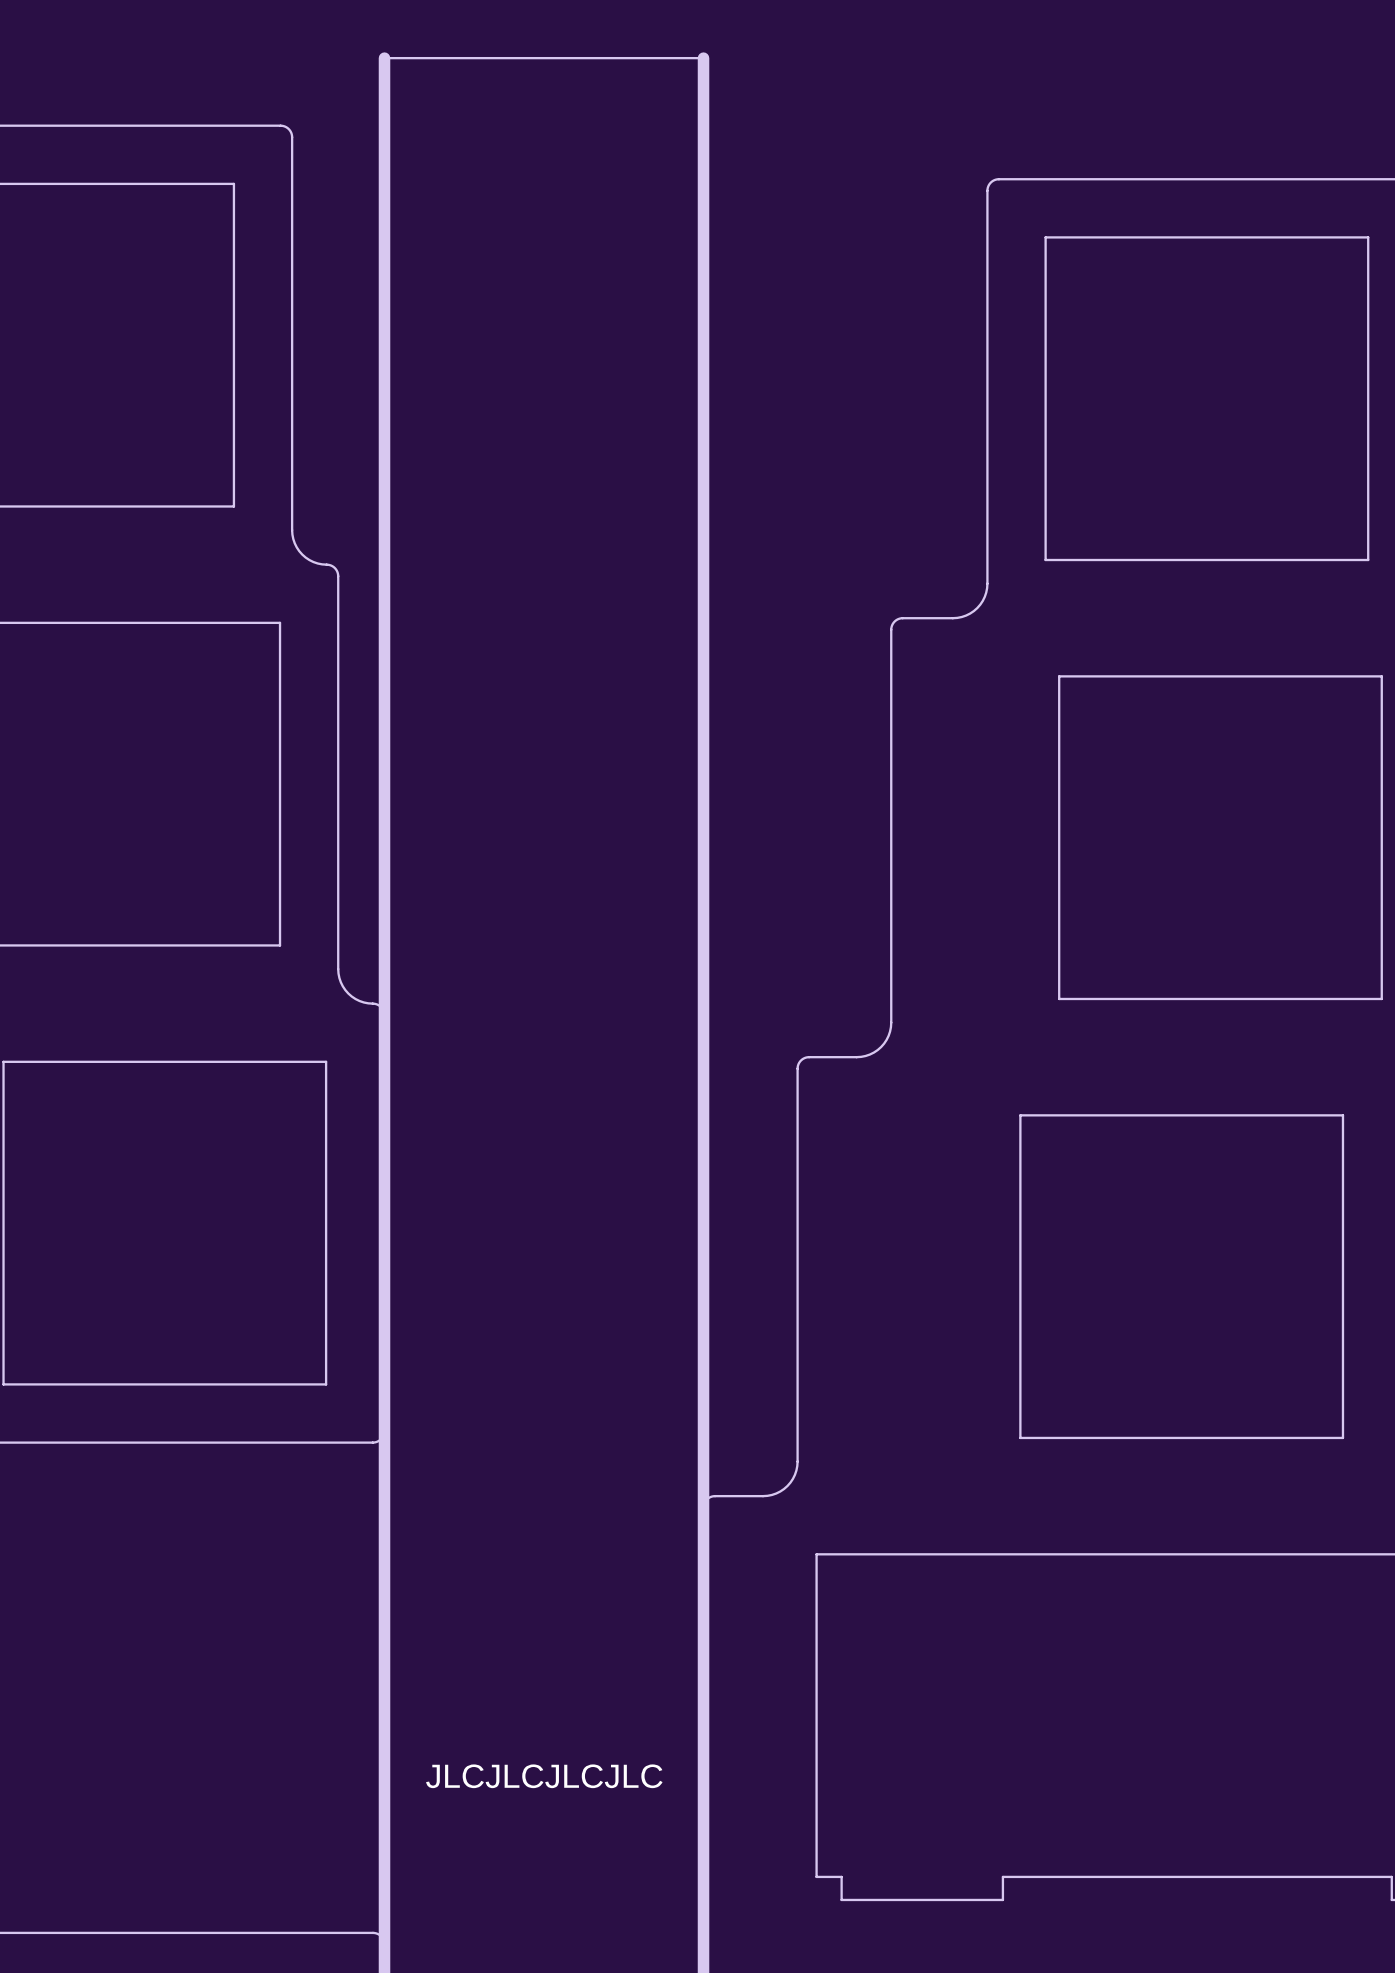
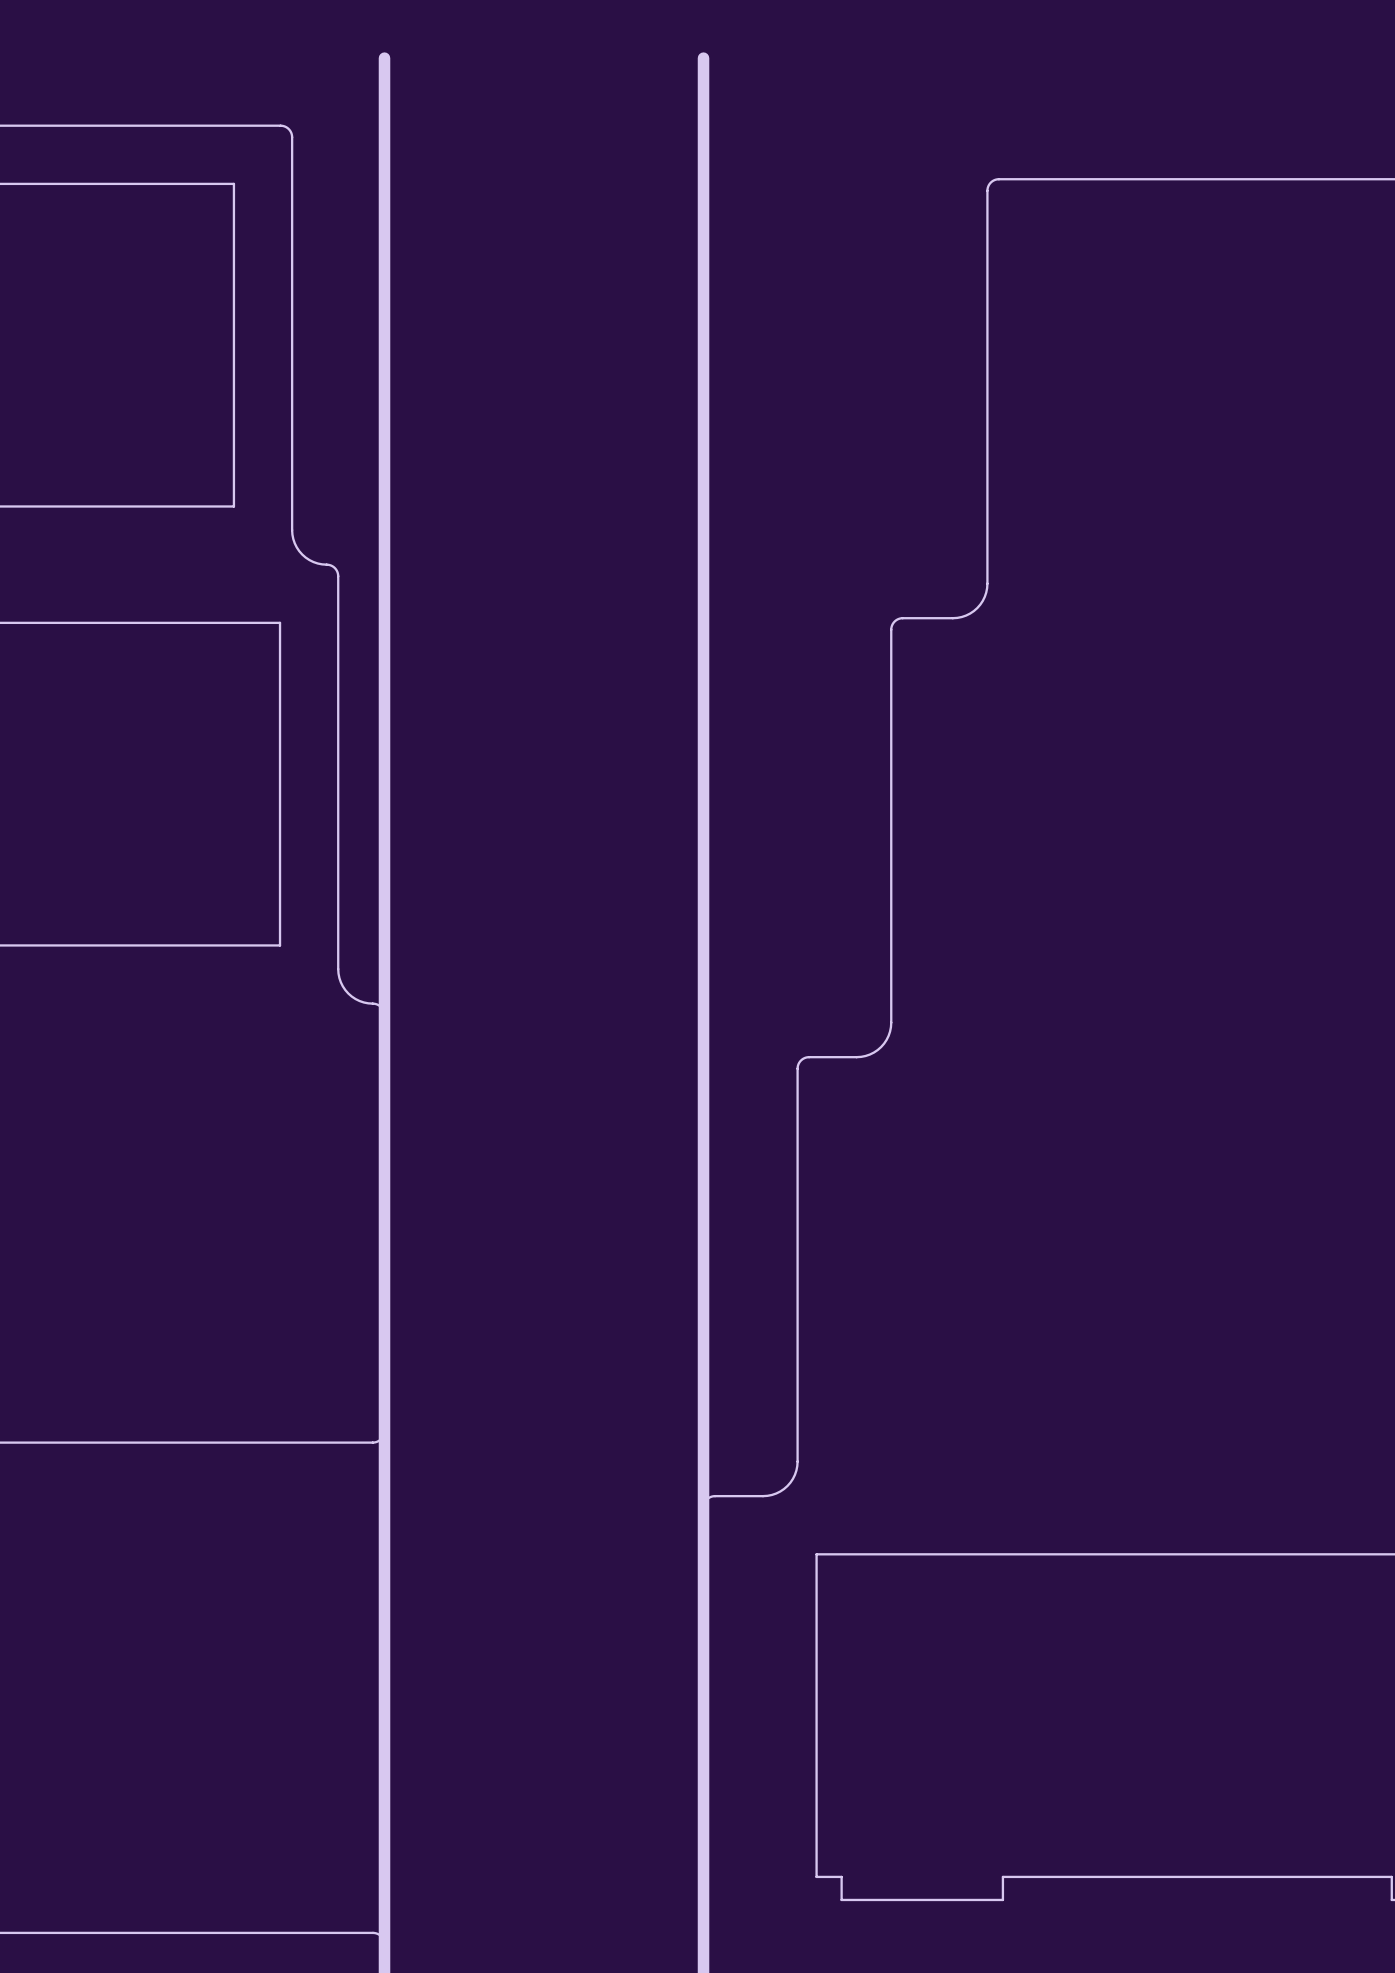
board edge: (384, 58) (703, 58) -> none
board edge: (1045, 237) (1368, 237) (1368, 560) (1045, 560) (1045, 237) -> none
board edge: (1059, 676) (1381, 676) (1381, 998) (1059, 998) (1059, 676) -> none
board edge: (3, 1061) (3, 1384) (326, 1384) (326, 1061) (3, 1061) -> none
board edge: (1020, 1115) (1342, 1115) (1342, 1437) (1020, 1437) (1020, 1115) -> none
text: JLCJLCJLCJLC (544, 1776) -> none

